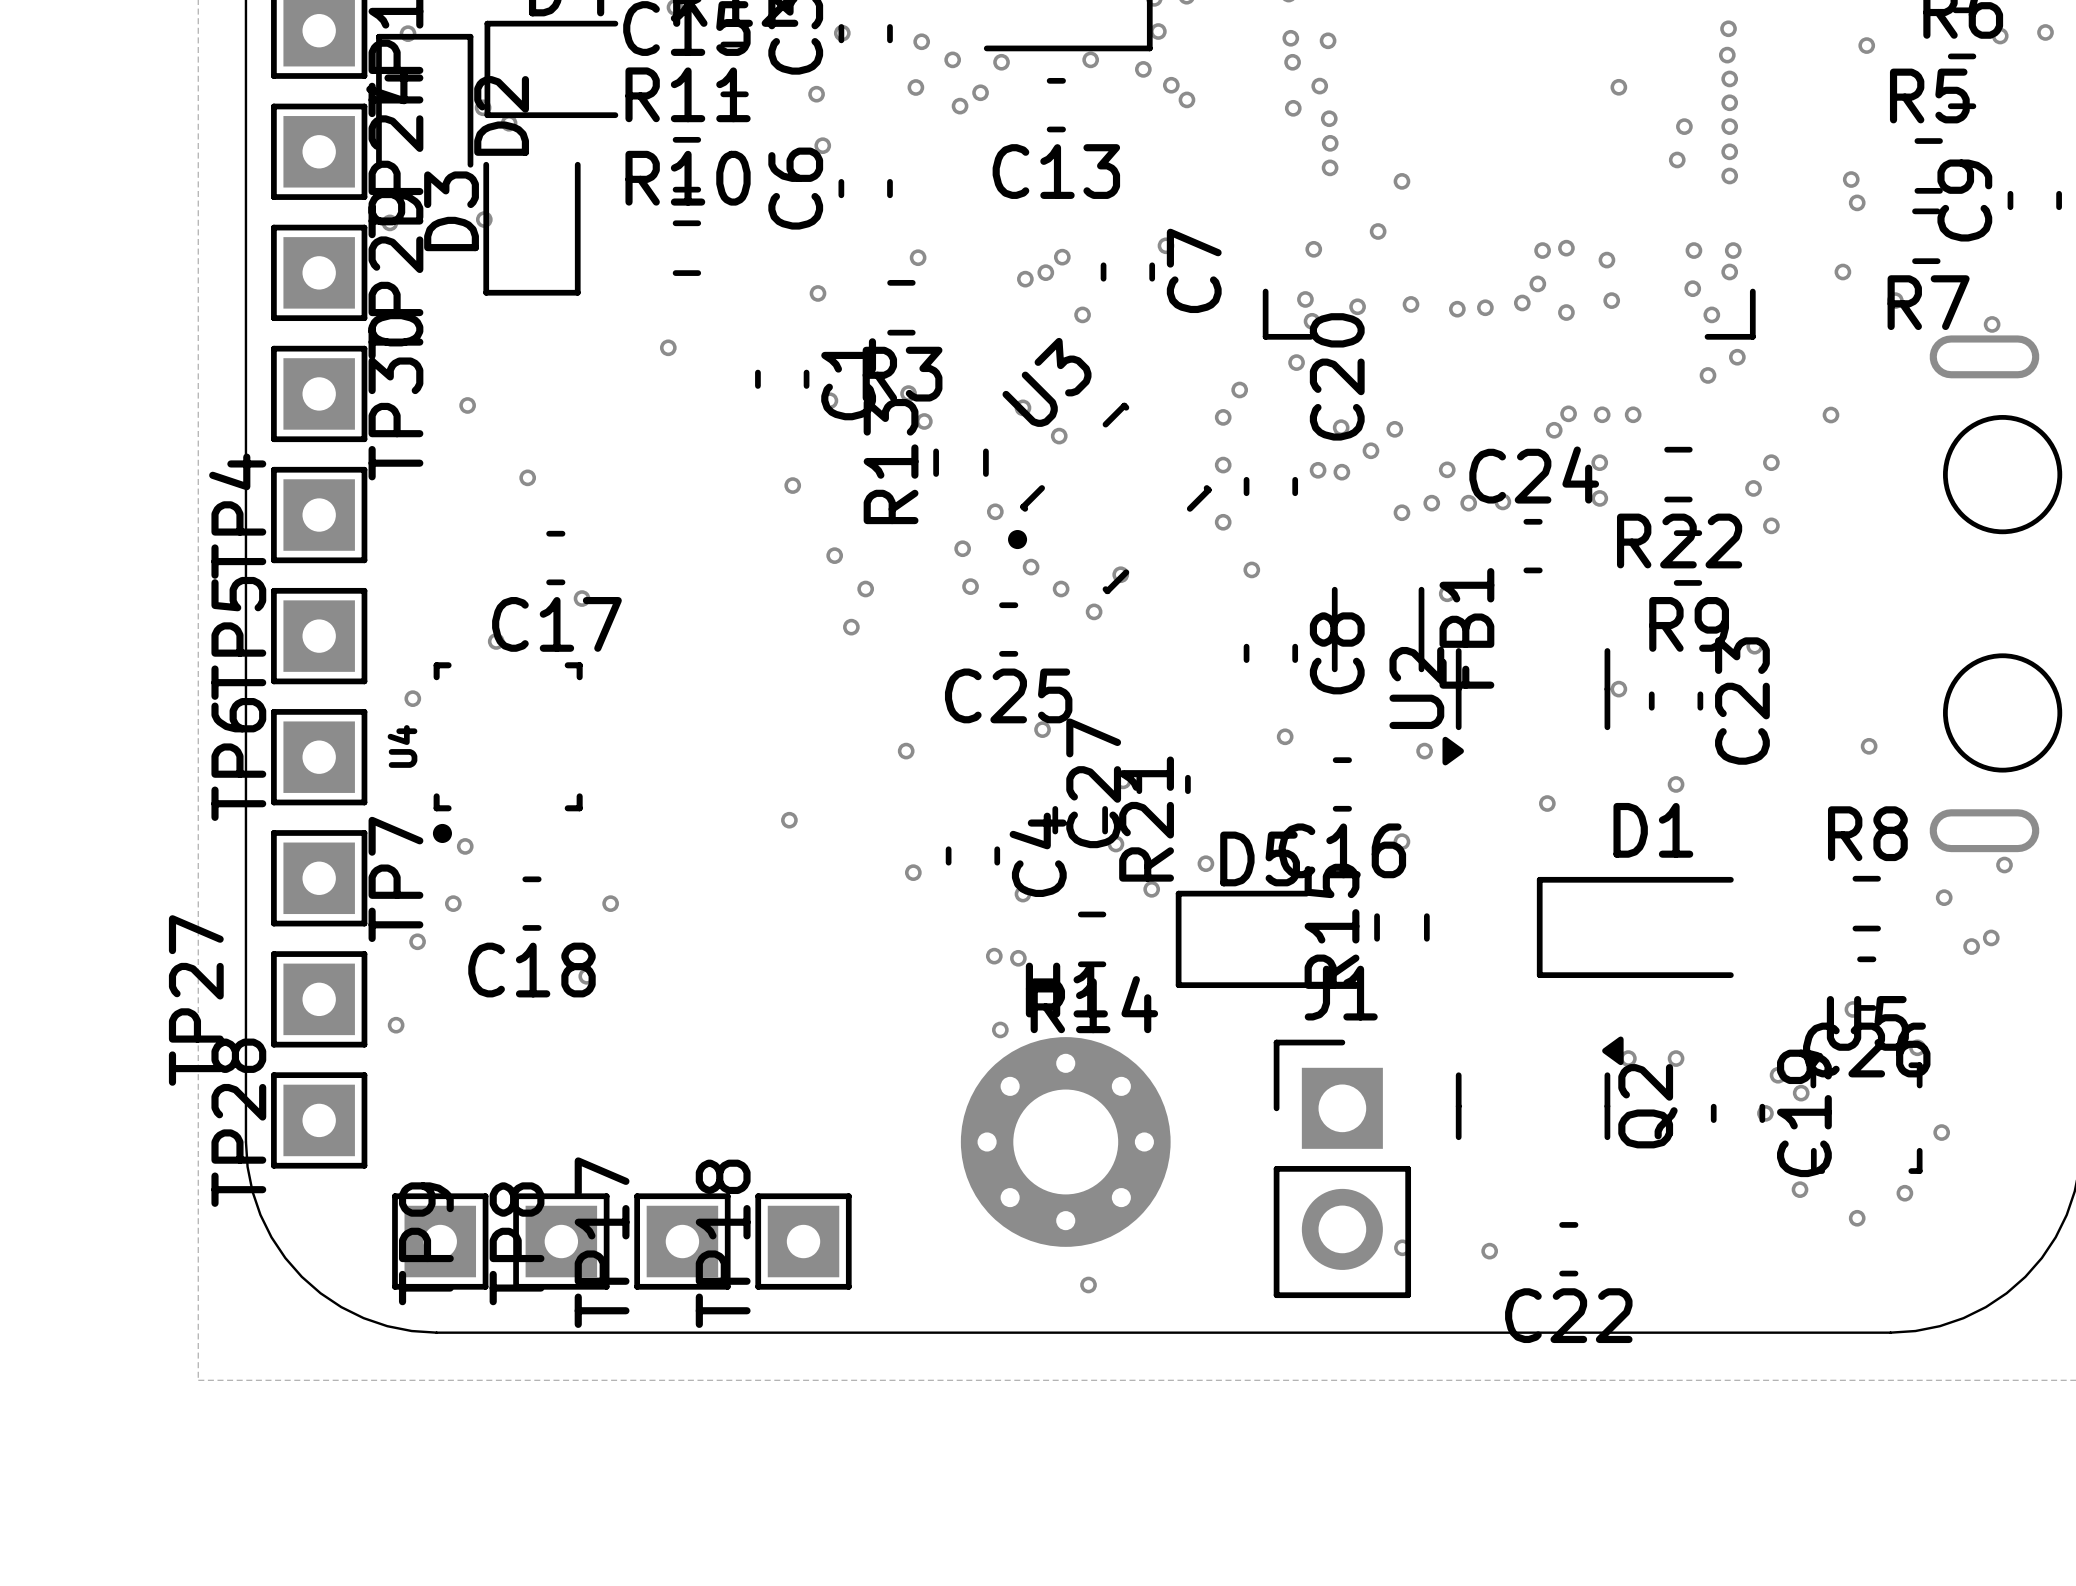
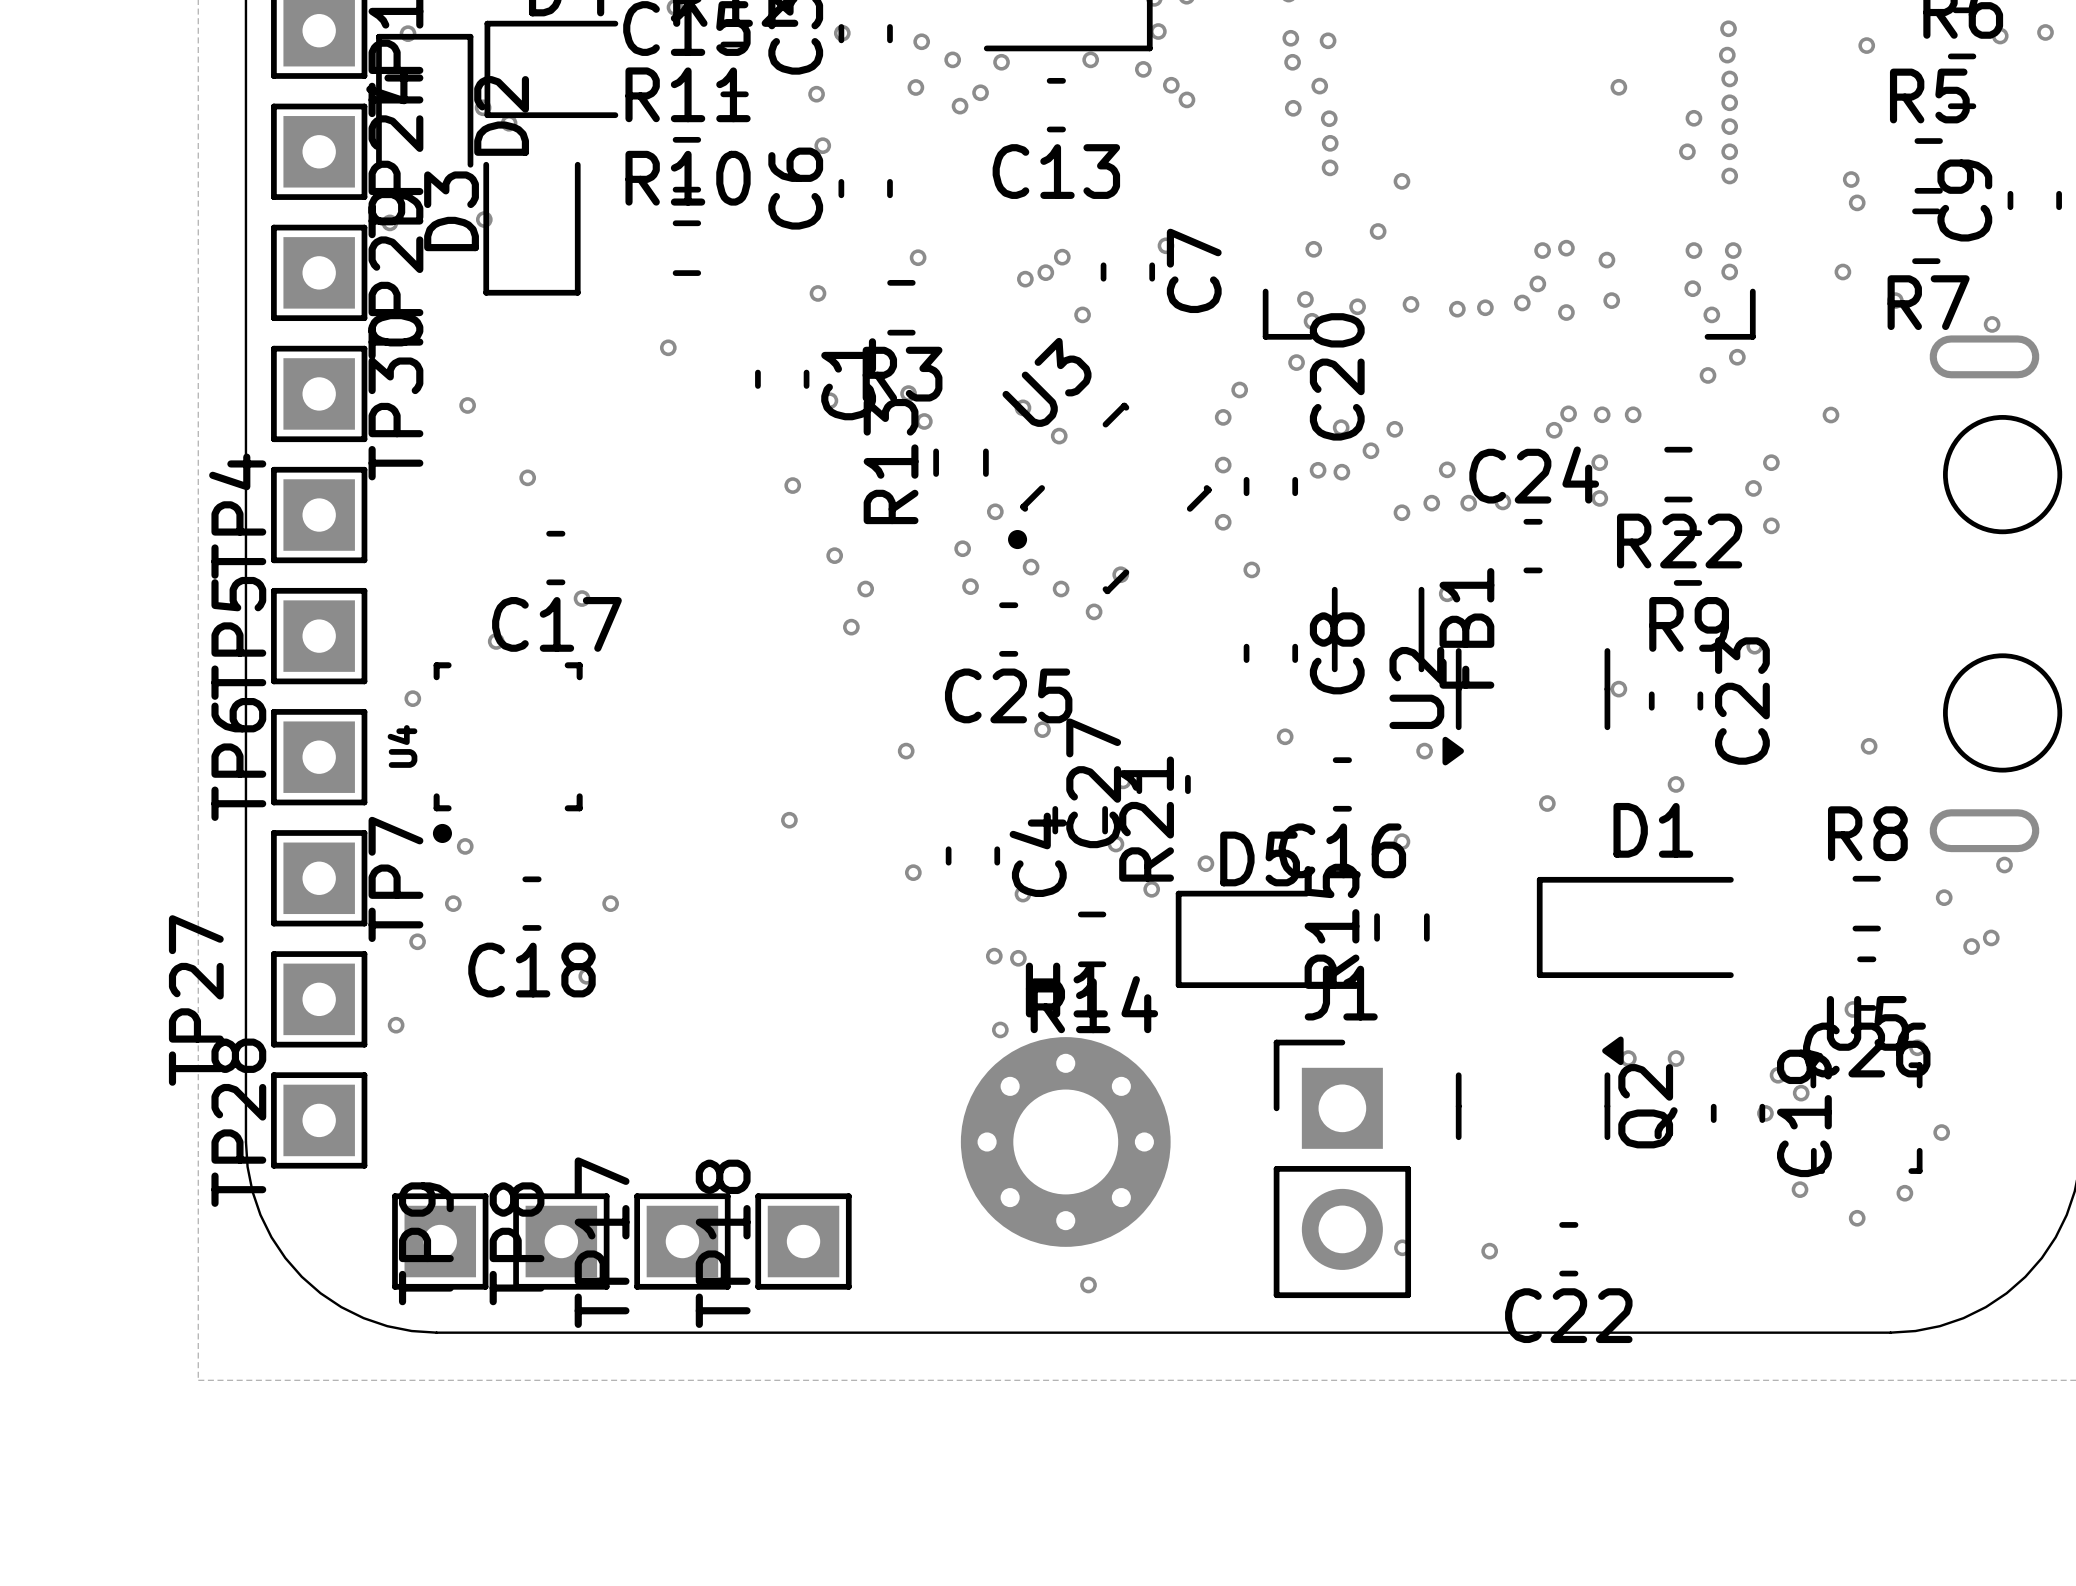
via position: (1684, 126) -> (1693, 118)
via position: (1677, 159) -> (1687, 151)

